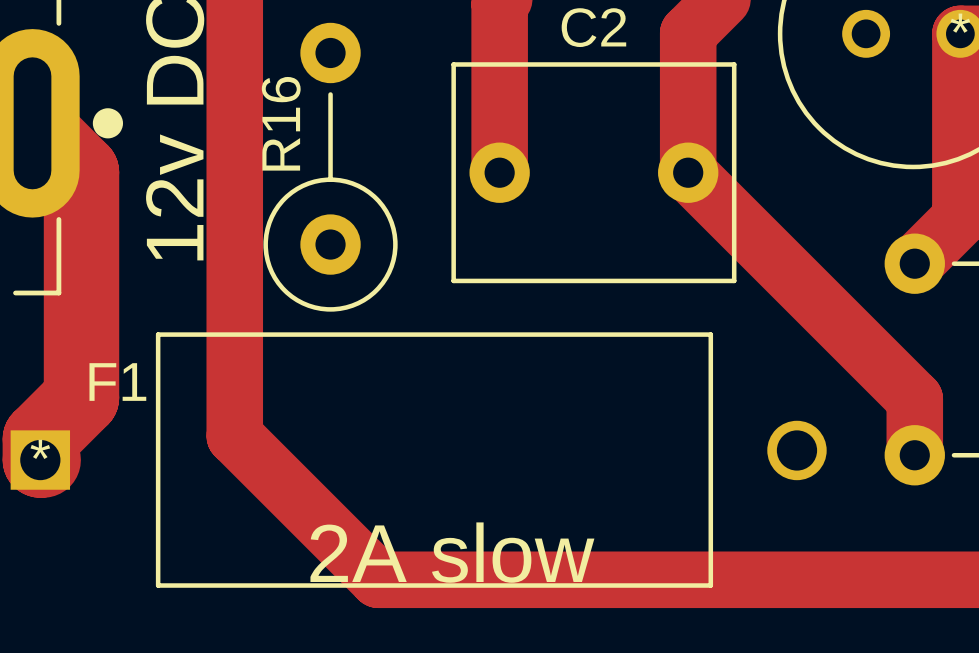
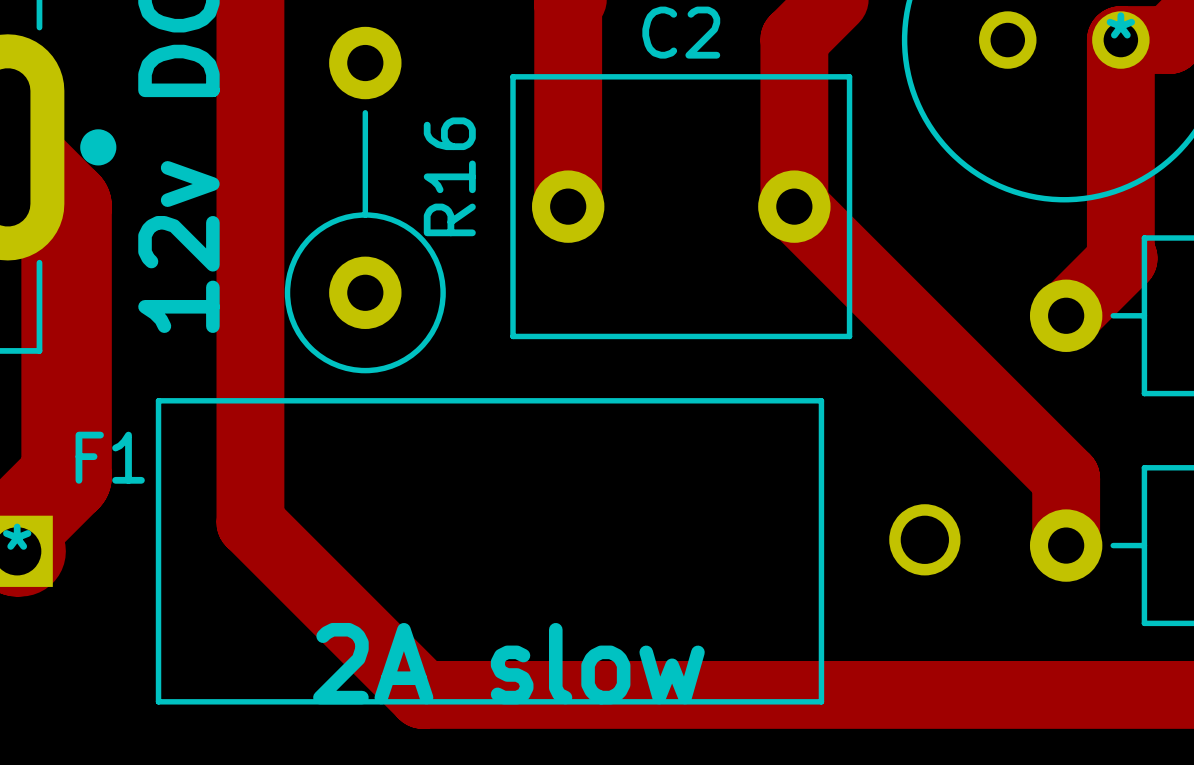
R16 name position: R16 (281, 123) -> R16 (449, 176)

